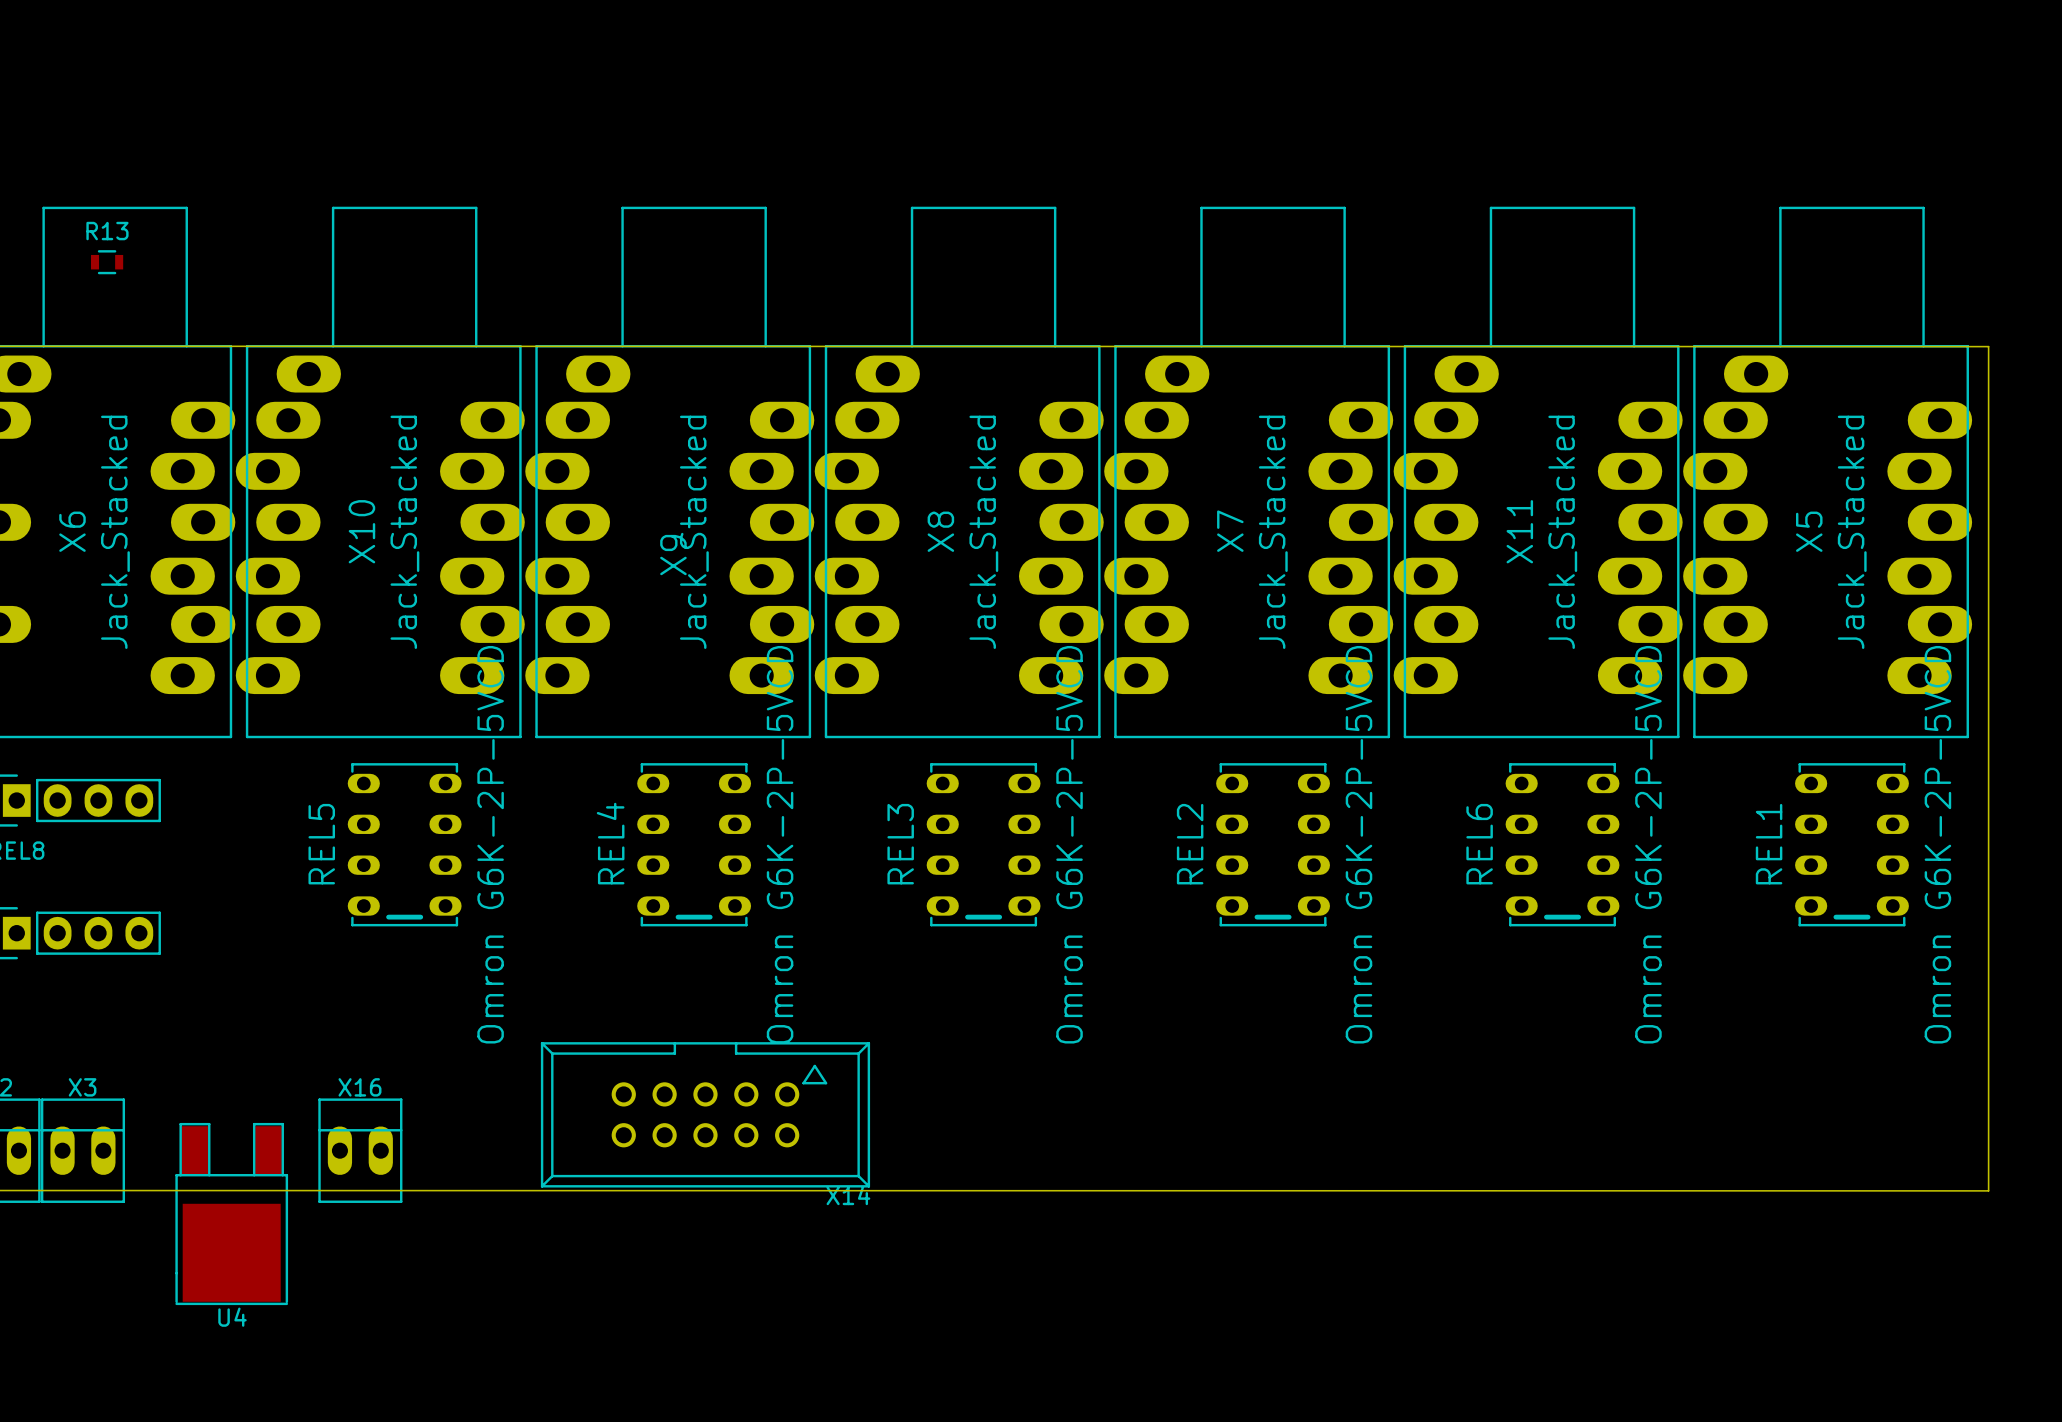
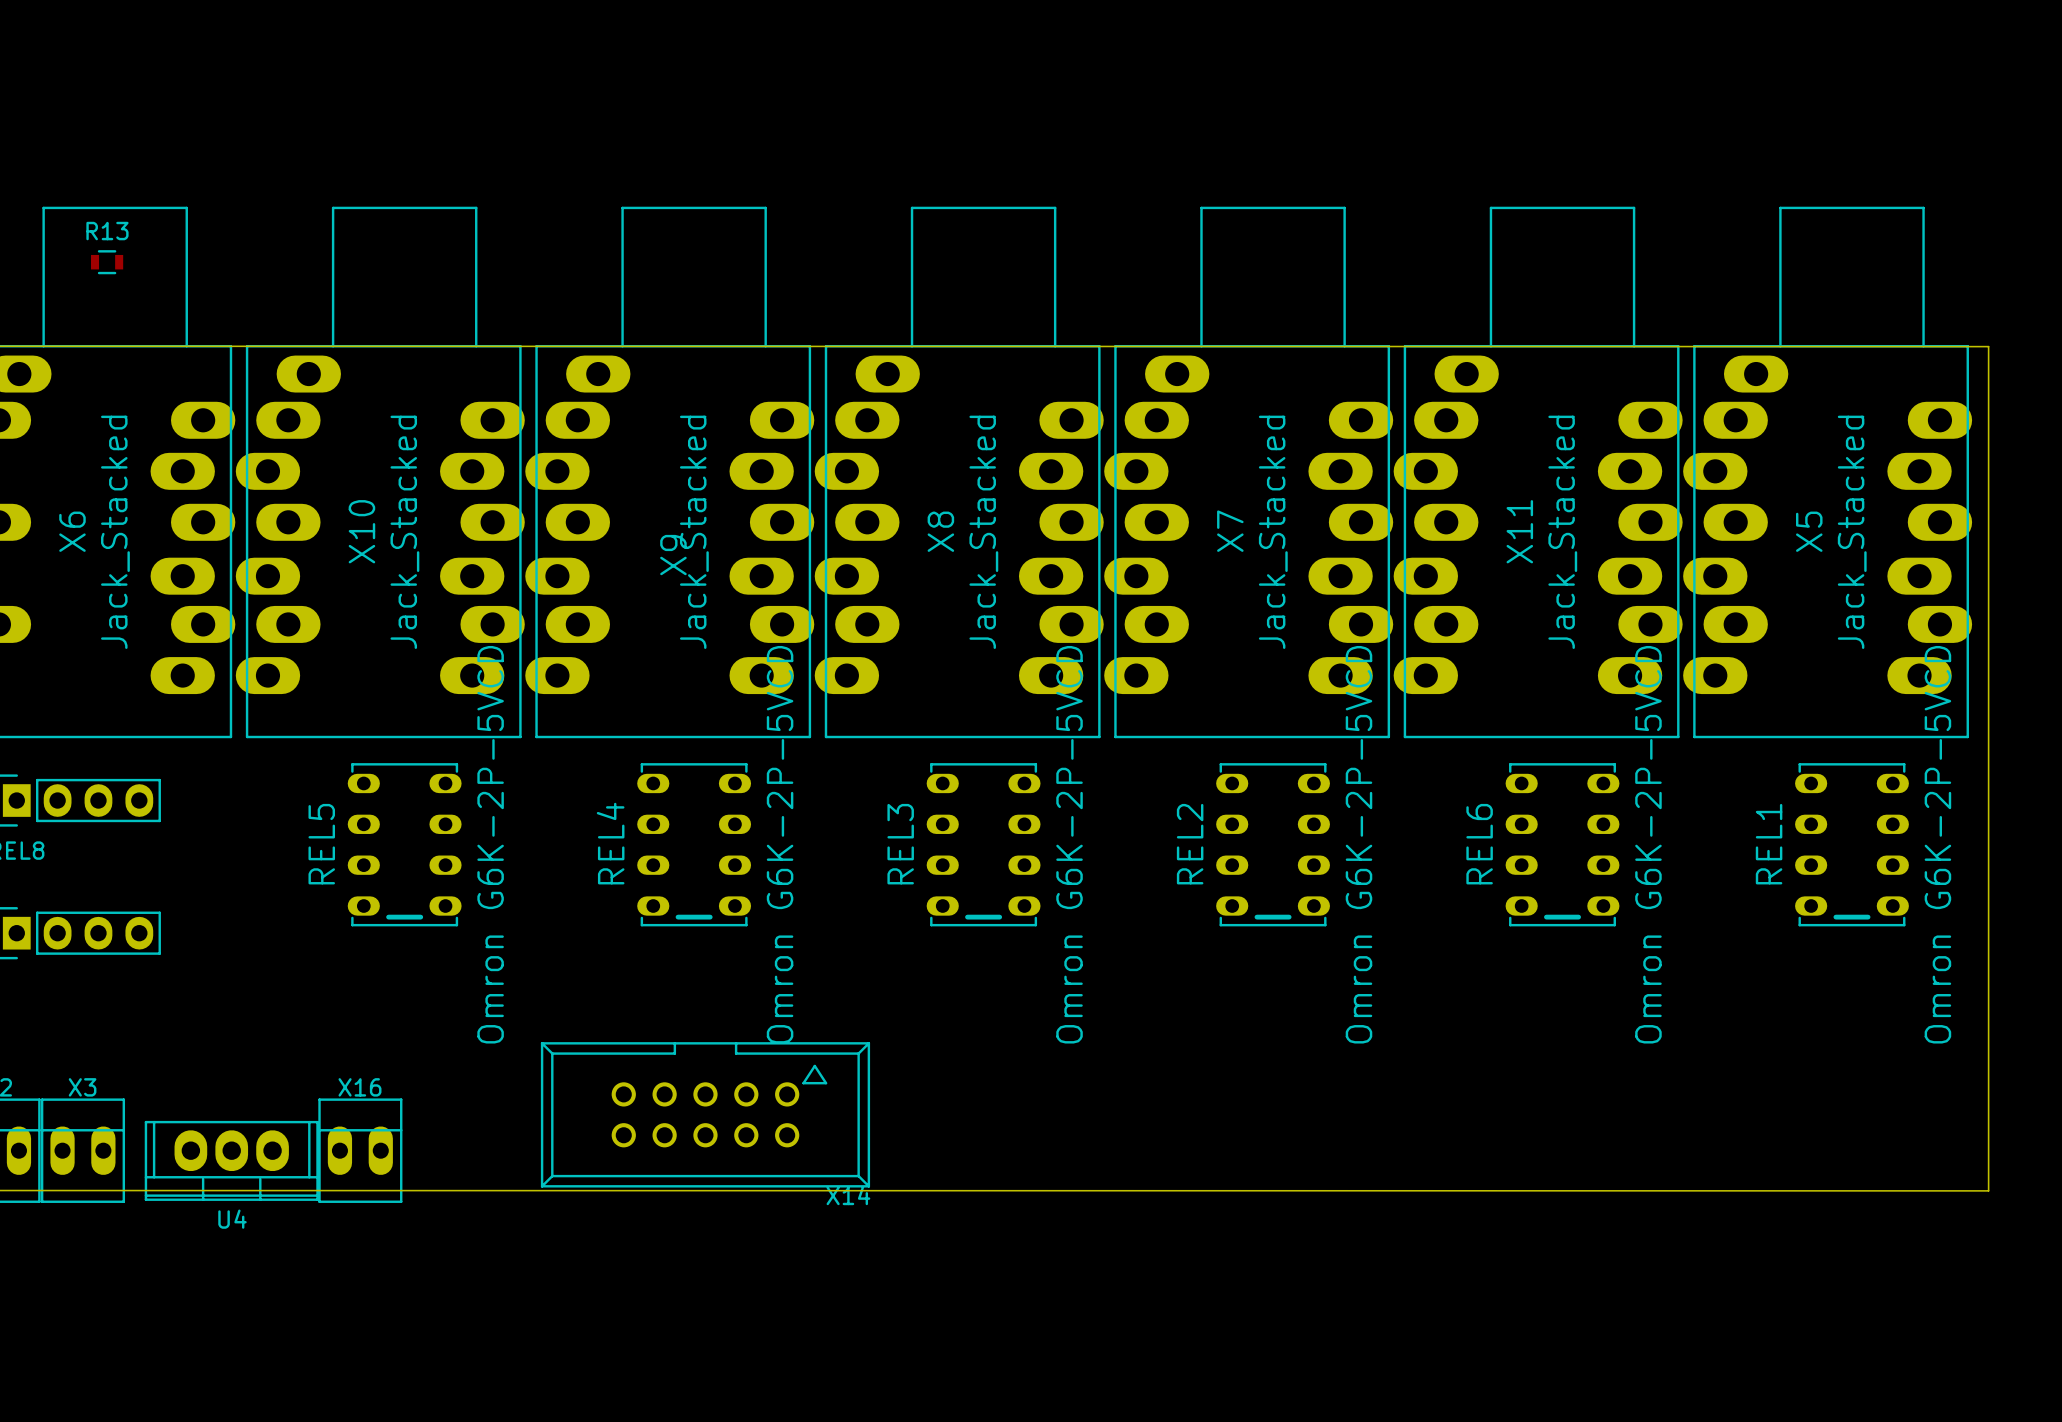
U4 footprint: [175, 1122, 289, 1306] -> [144, 1120, 319, 1201]
U4 name position: U4 (232, 1317) -> U4 (232, 1219)

